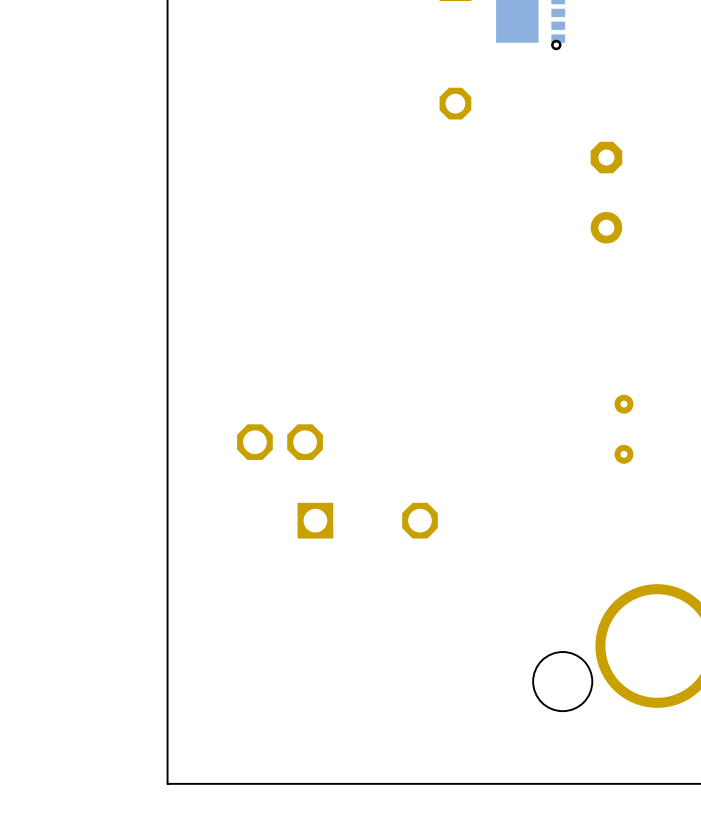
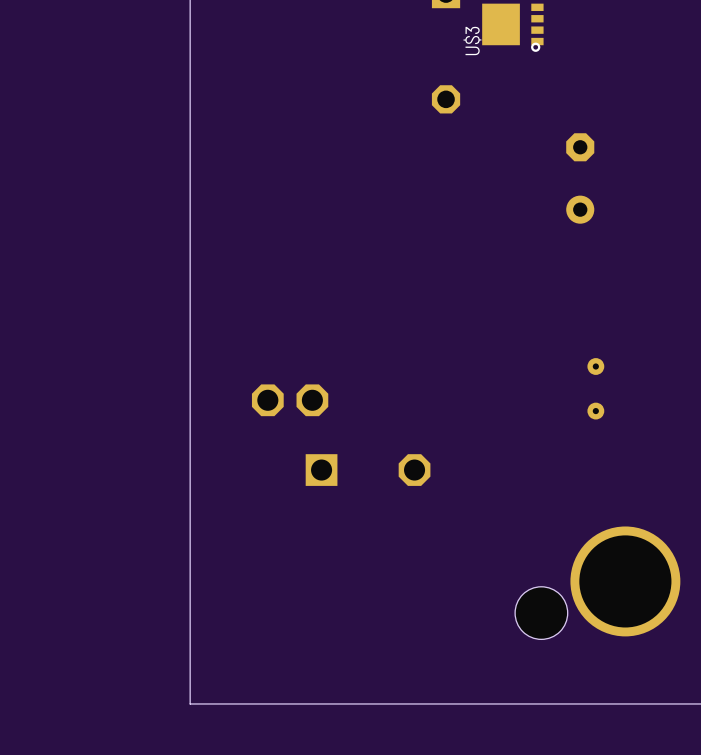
U$3 name: none -> U$3 (472, 40)

